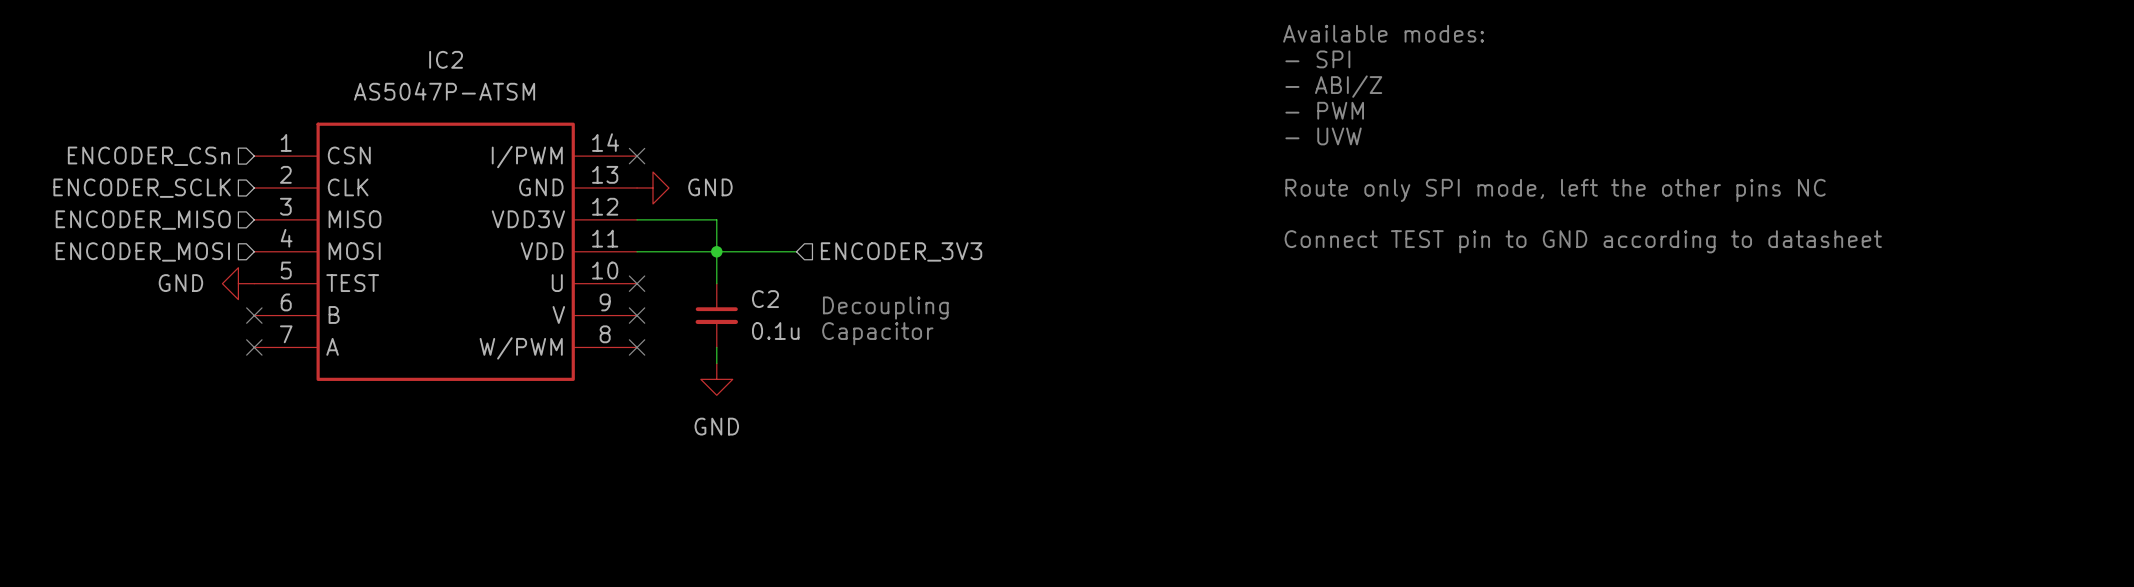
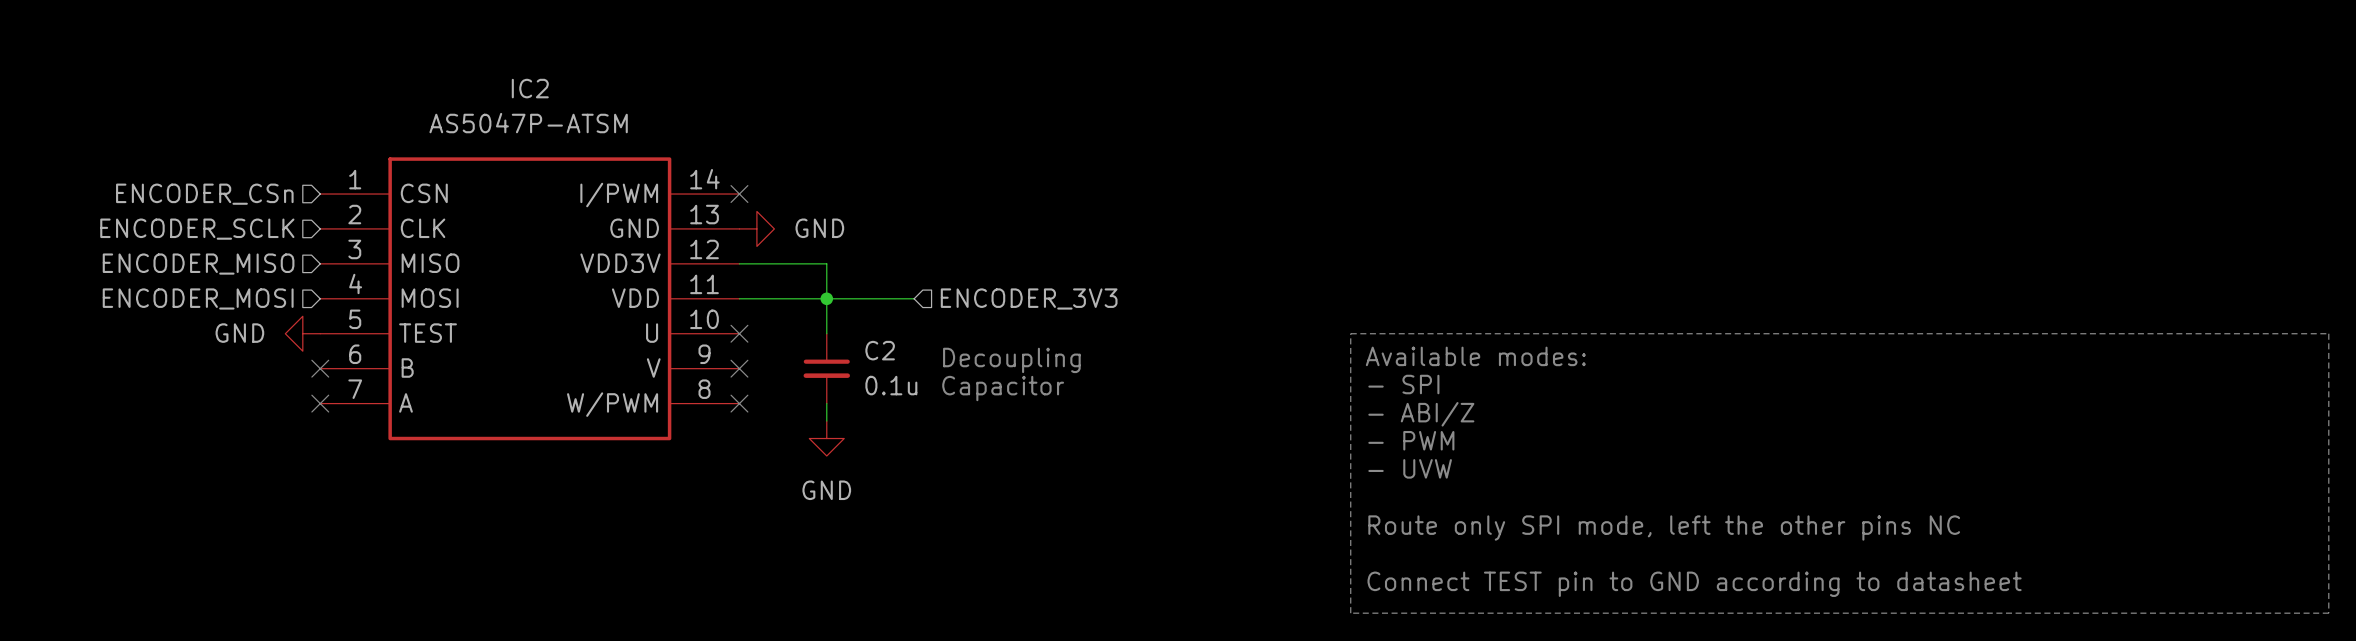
text position: Available modes: (1383, 33) -> Available modes: (1475, 356)
text position: - SPI (1317, 59) -> - SPI (1403, 384)
text position: - ABI/Z (1333, 86) -> - ABI/Z (1421, 414)
text position: - PWM (1324, 110) -> - PWM (1411, 440)
text position: - UVW (1323, 136) -> - UVW (1410, 468)
text position: Route only SPI mode, left the other pins NC (1555, 190) -> Route only SPI mode, left the other pins NC (1664, 528)
text position: Connect TEST pin to GND according to datasheet (1583, 241) -> Connect TEST pin to GND according to datasheet (1694, 584)
line: none -> (1350, 333) (2328, 333) (2328, 613) (1350, 613) (1350, 333)

